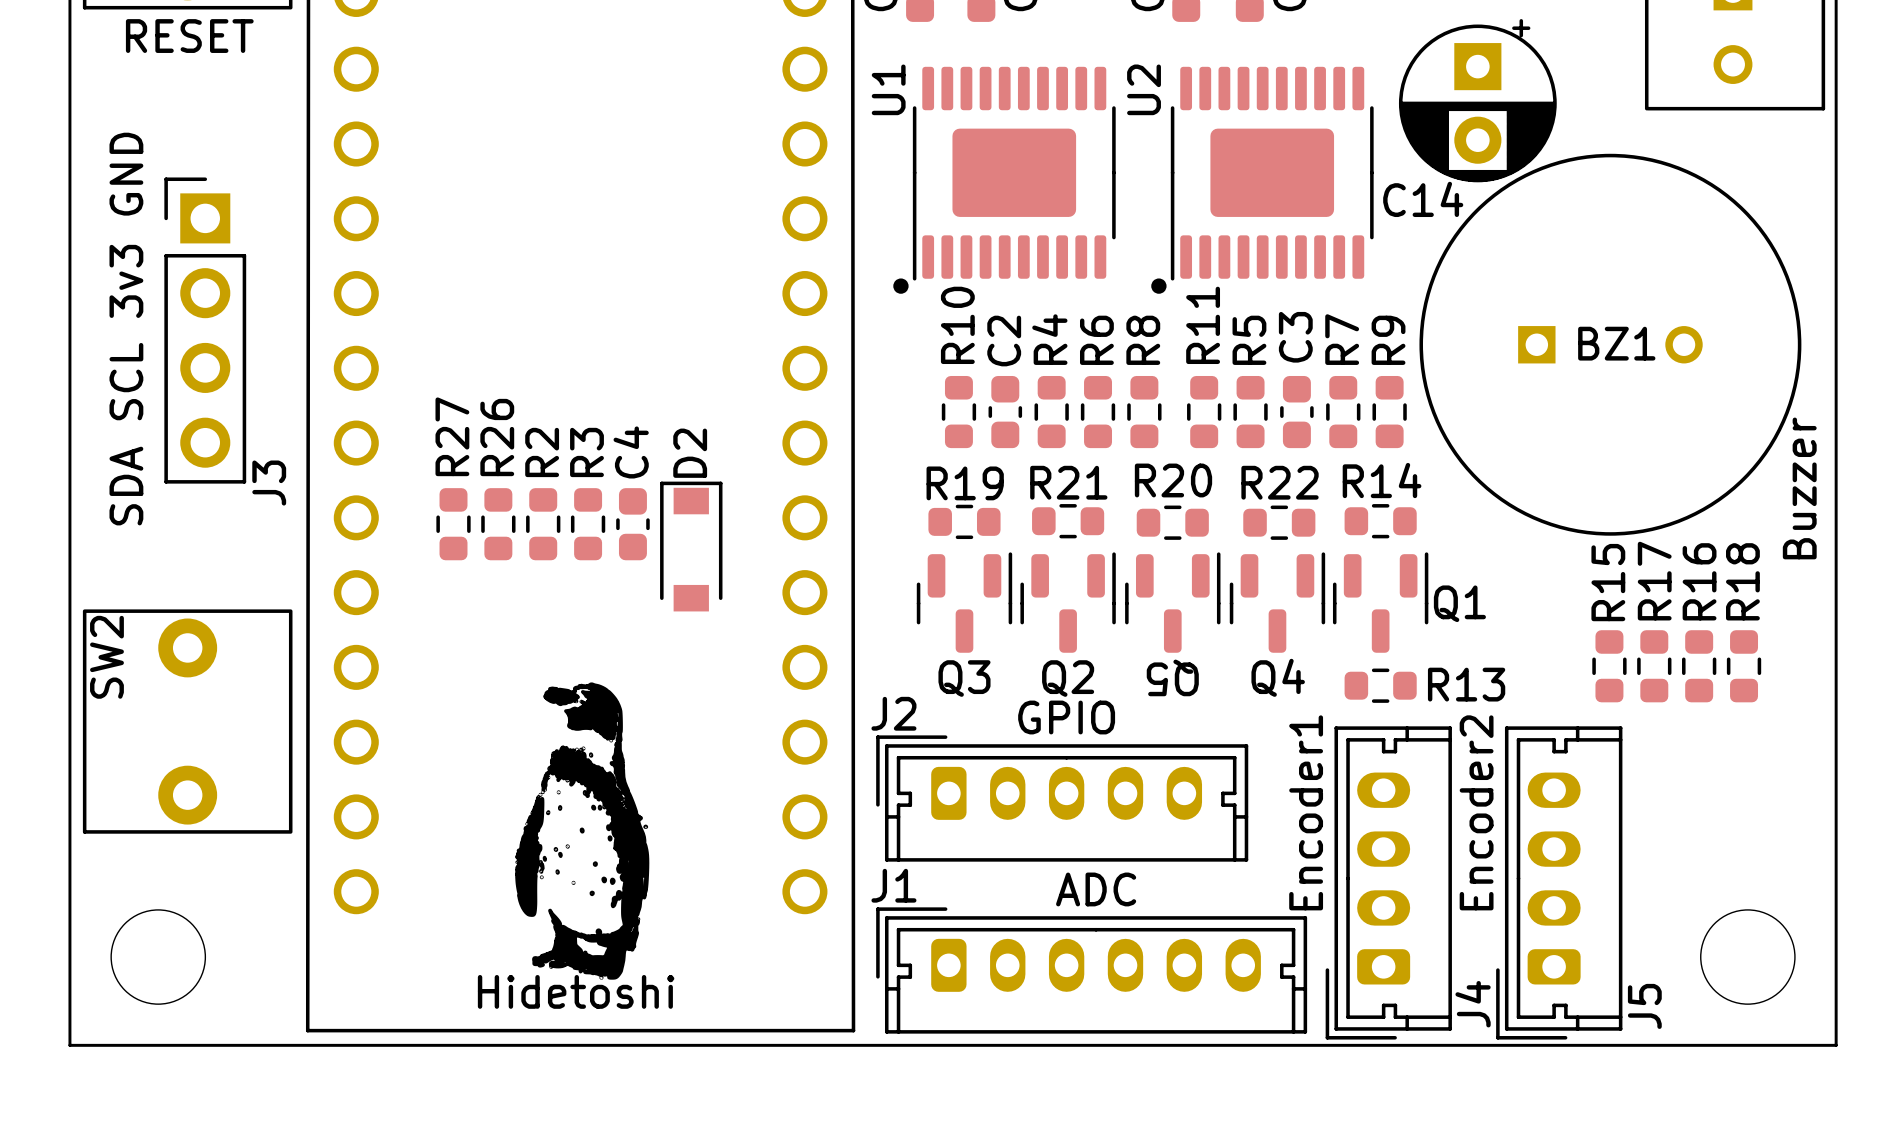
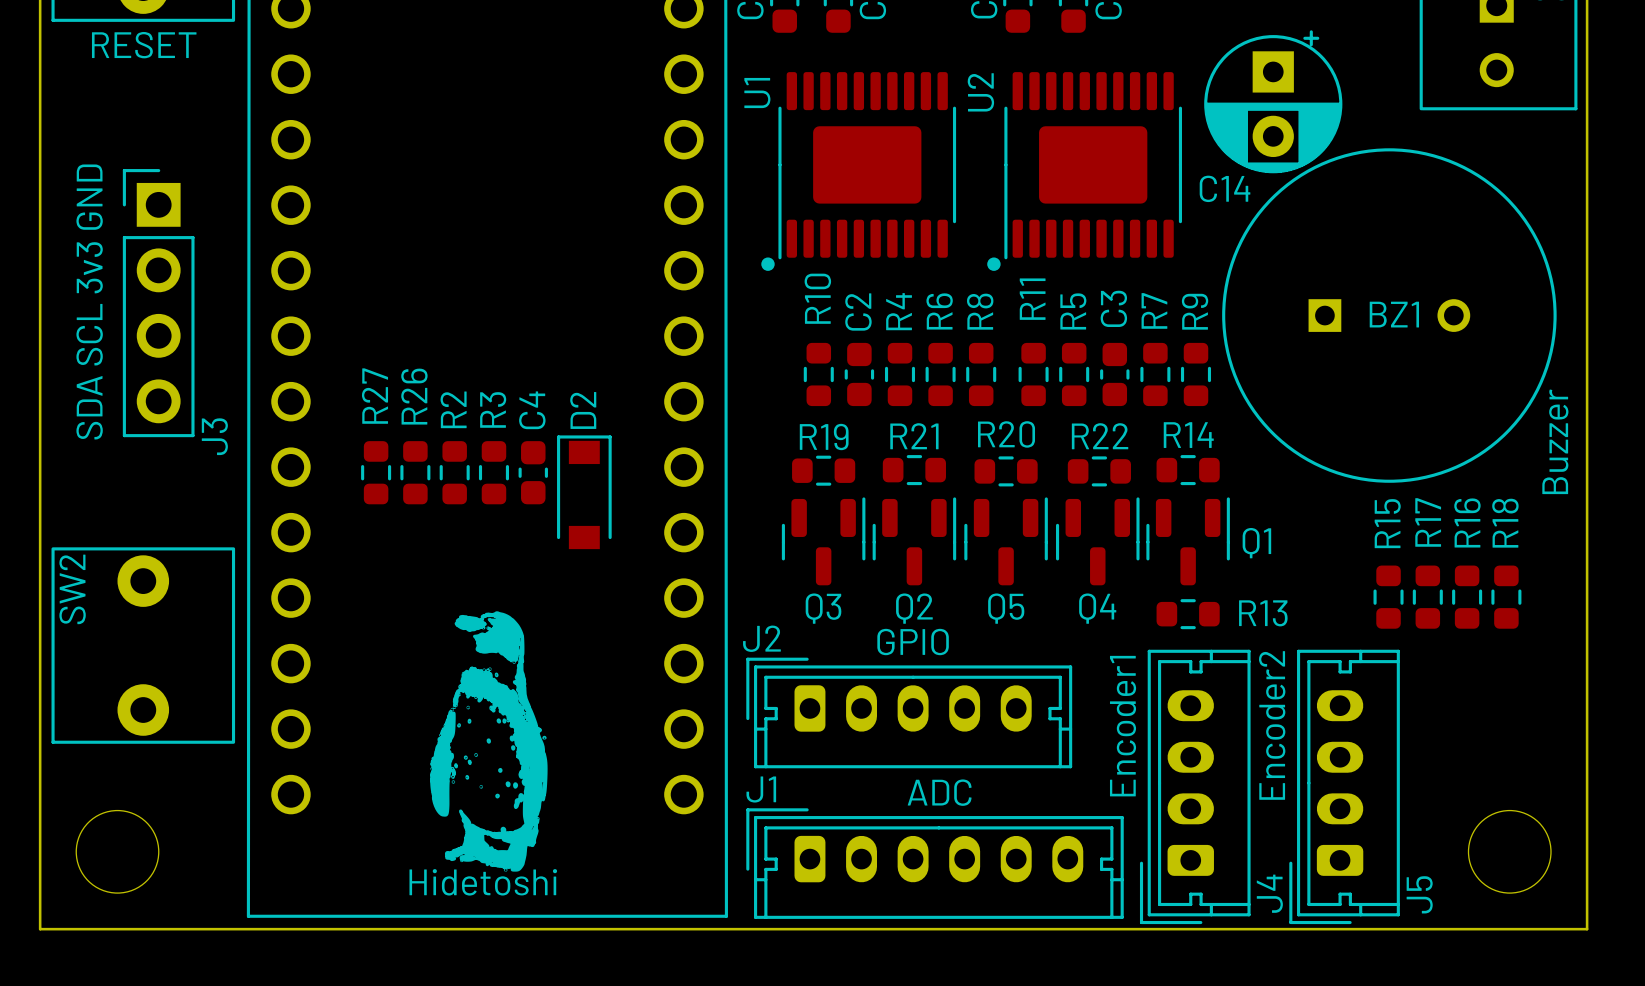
Q5 name rotation: 0° (1172, 677) -> 180° (1006, 608)

